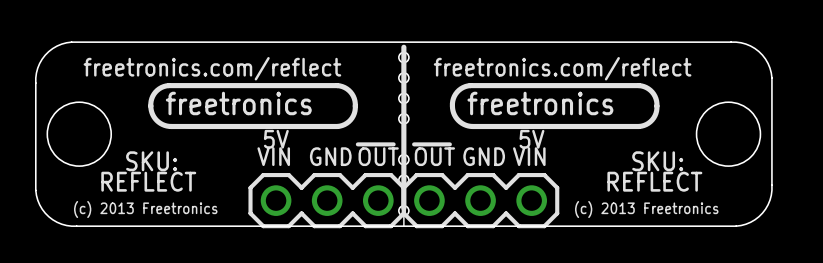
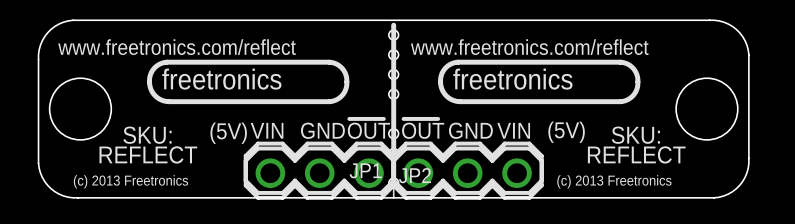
text: freetronics.com/reflect (212, 68) -> www.freetronics.com/reflect (177, 47)
text: freetronics.com/reflect (562, 68) -> www.freetronics.com/reflect (529, 47)
text: 5V (276, 139) -> (5V) (228, 133)
text: 5V (531, 139) -> (5V) (566, 132)
line: none -> (529, 143) (541, 155) (541, 180) (529, 192) (504, 192) (492, 180) (480, 192) (455, 192) (443, 180) (430, 192) (406, 192) (393, 180) (381, 192) (356, 192) (344, 180) (332, 192) (307, 192) (295, 180) (282, 192) (258, 192) (245, 180) (245, 155) (258, 143) (282, 143) (295, 155) (307, 143) (332, 143) (344, 155) (356, 143) (381, 143) (393, 155) (406, 143) (430, 143) (443, 155) (455, 143) (480, 143) (492, 155) (504, 143) (529, 143)
JP1 name: none -> JP1 (365, 170)
JP2 name: none -> JP2 (414, 175)

